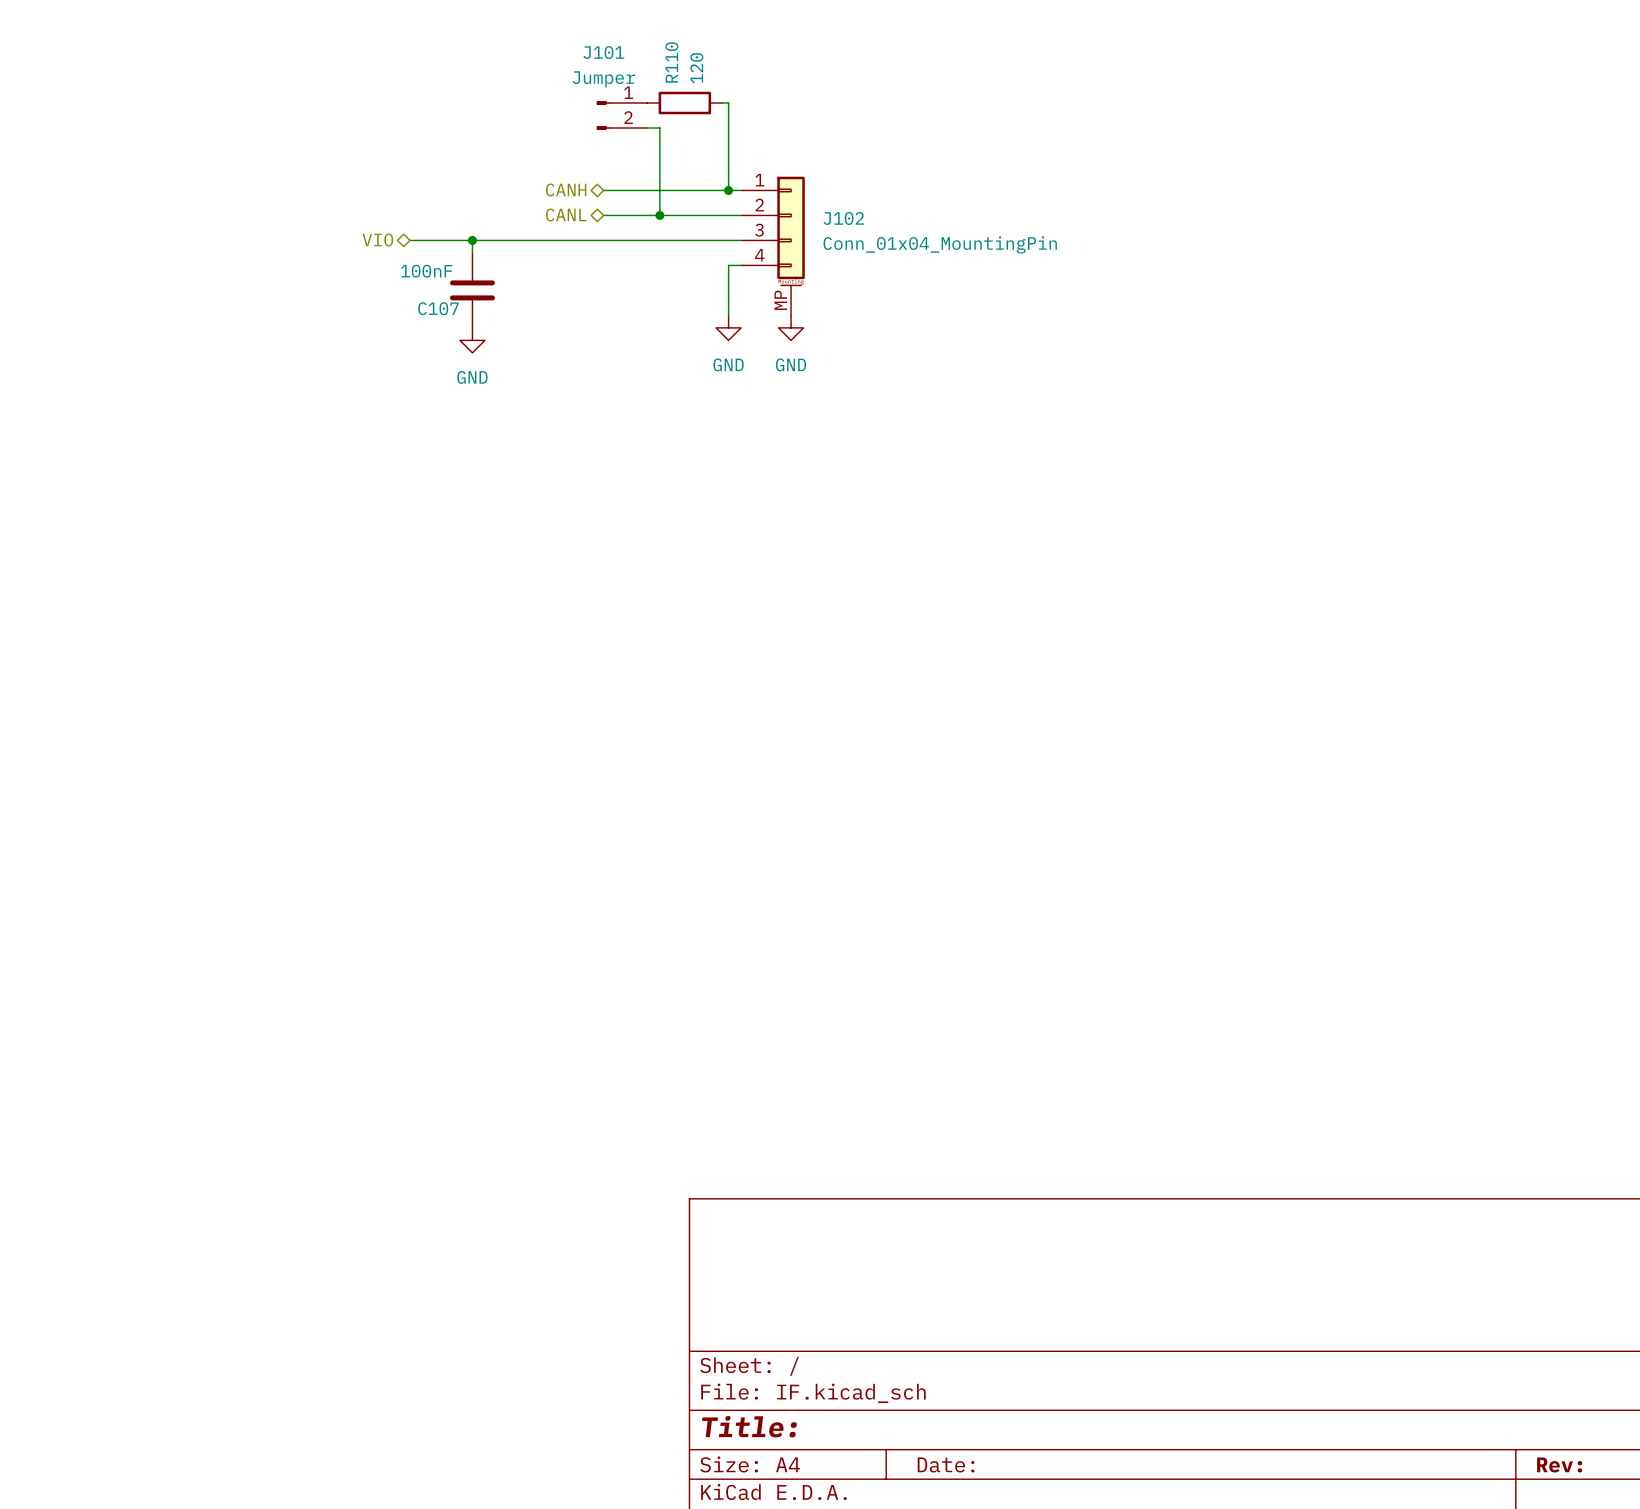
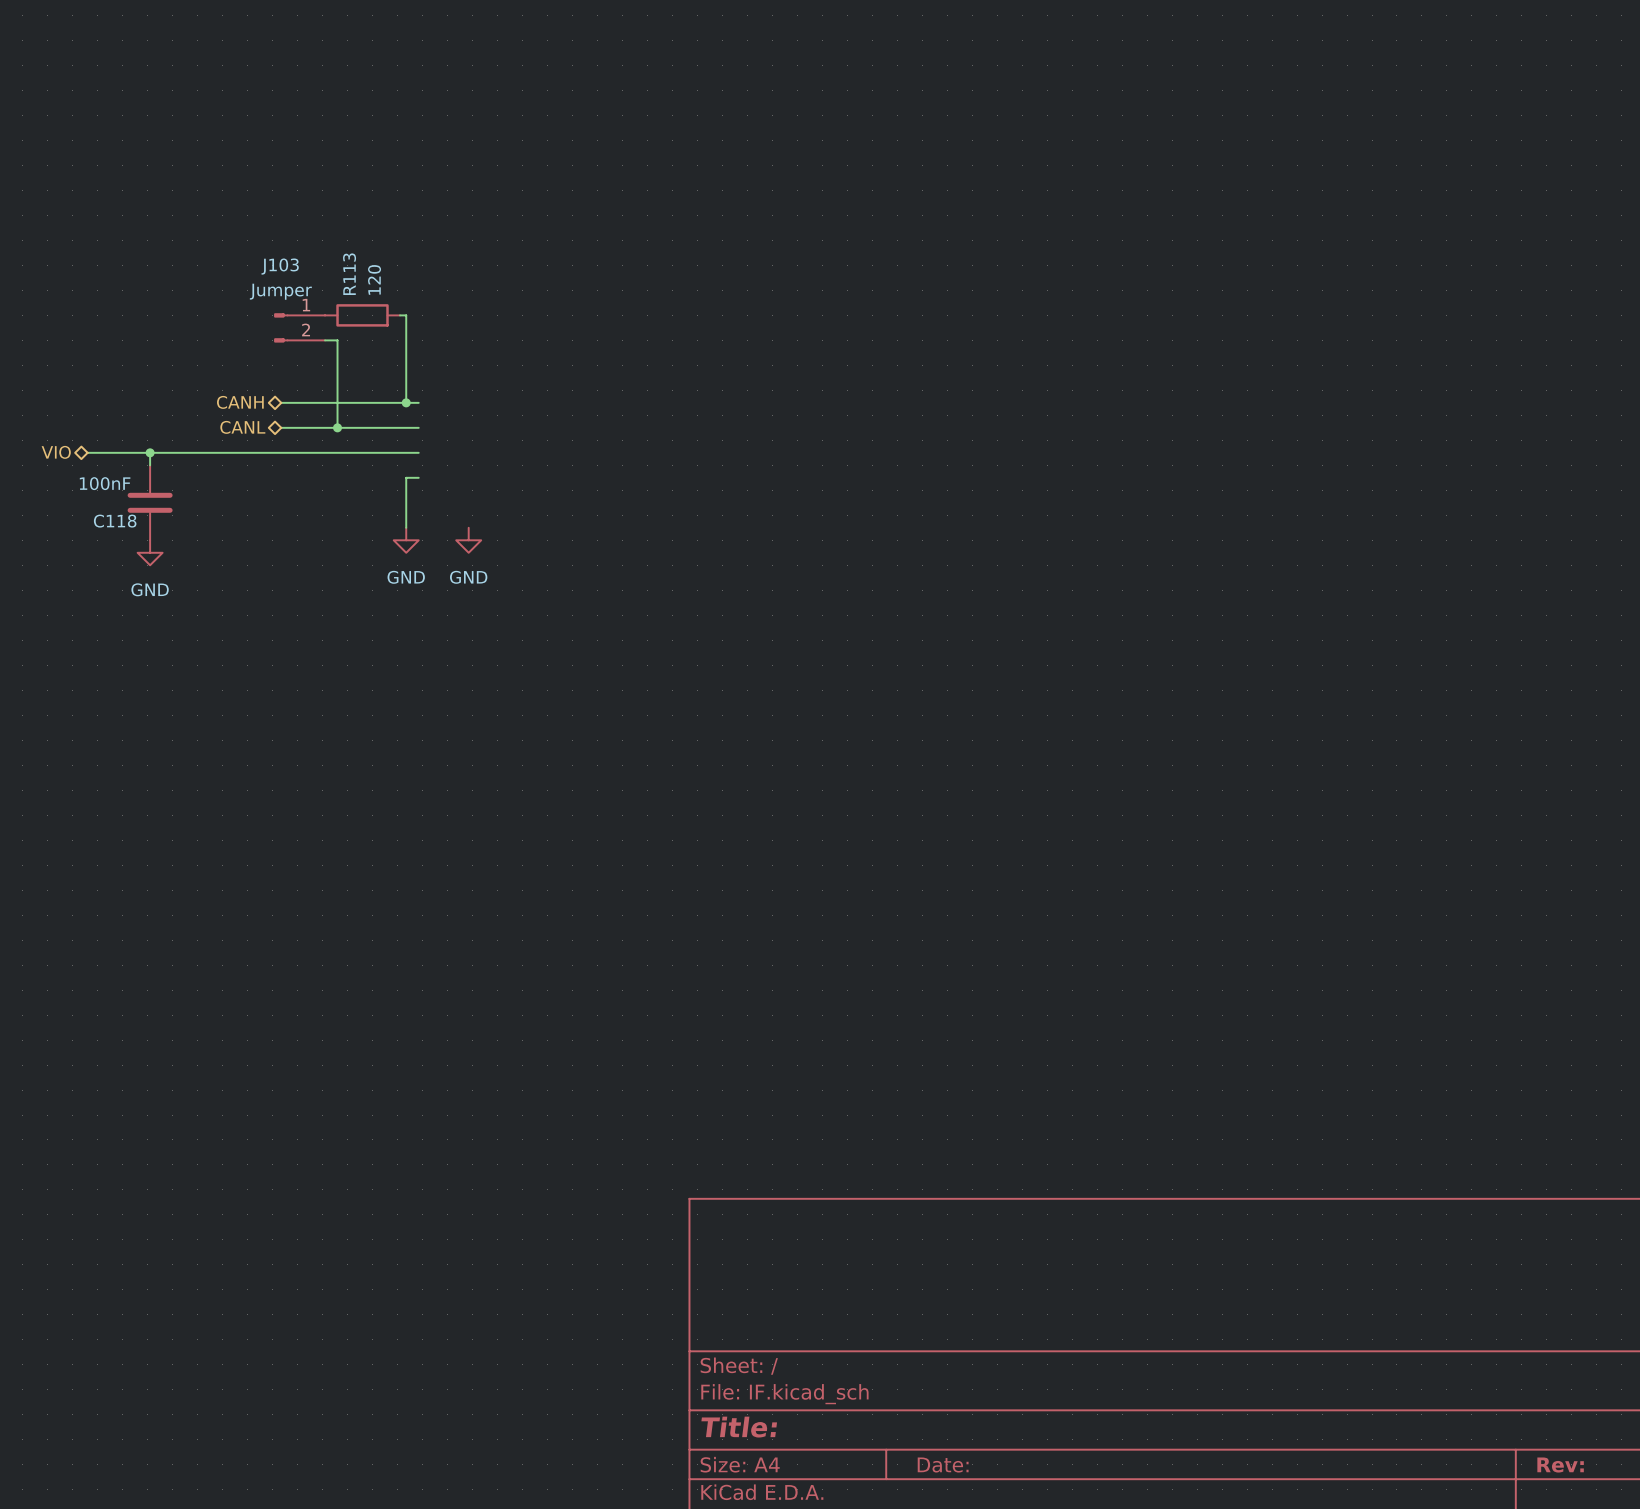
R110: 120 (684, 103) -> none
wire: (722, 103) (728, 103) (728, 190) -> none
J101: Jumper (622, 115) -> none
wire: (647, 127) (659, 127) (659, 215) -> none
hierarchical label: CANH (566, 190) -> none
wire: (603, 190) (741, 190) -> none
junction: (728, 190) -> none
hierarchical label: CANL (566, 214) -> none
wire: (603, 215) (741, 215) -> none
junction: (659, 215) -> none
hierarchical label: VIO (377, 239) -> none
wire: (409, 240) (741, 240) -> none
wire: (472, 240) (472, 252) -> none
junction: (472, 240) -> none
J102: Conn_01x04_MountingPin (772, 246) -> none
wire: (741, 265) (728, 265) (728, 315) -> none
C107: 100nF (472, 290) -> none
R113: none -> 120 (362, 315)
wire: none -> (399, 315) (406, 315) (406, 402)
J103: none -> Jumper (299, 327)
power symbol: GND (728, 327) -> none
power symbol: GND (791, 327) -> none
wire: none -> (325, 340) (337, 340) (337, 427)
power symbol: GND (472, 340) -> none
hierarchical label: none -> CANH (240, 402)
wire: none -> (281, 402) (418, 402)
junction: none -> (406, 402)
hierarchical label: none -> CANL (242, 427)
wire: none -> (281, 427) (418, 427)
junction: none -> (337, 427)
hierarchical label: none -> VIO (56, 452)
wire: none -> (87, 452) (418, 452)
wire: none -> (150, 452) (150, 465)
junction: none -> (150, 452)
wire: none -> (418, 477) (406, 477) (406, 527)
C118: none -> 100nF (150, 502)
power symbol: none -> GND (406, 540)
power symbol: none -> GND (468, 540)
power symbol: none -> GND (150, 552)

